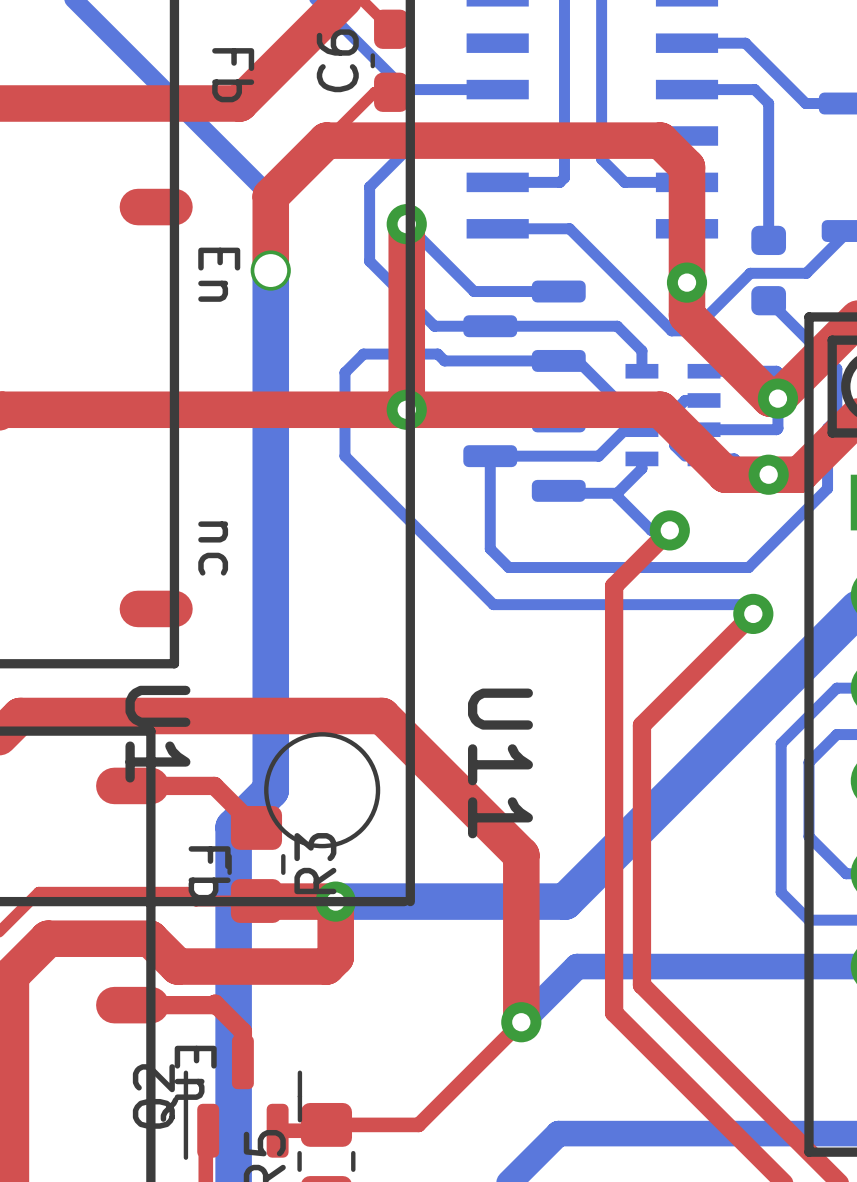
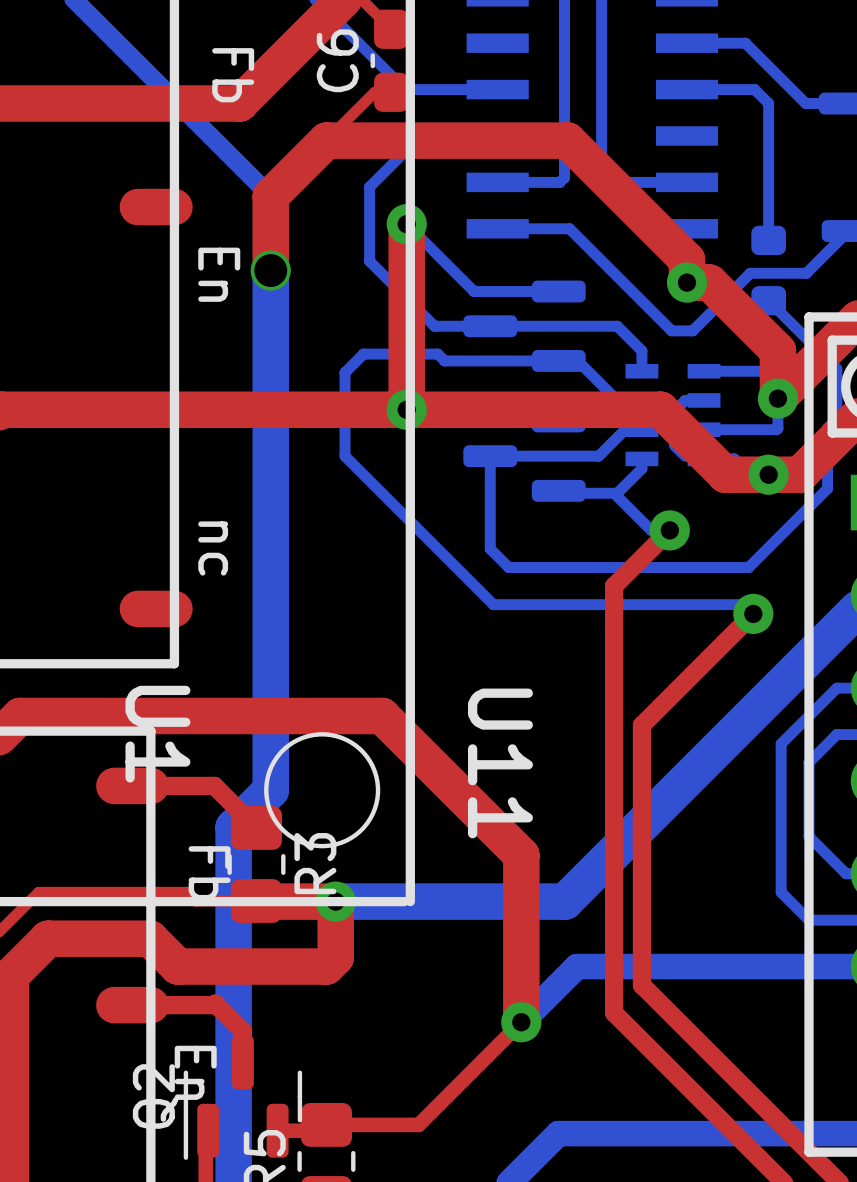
top track: (567, 140) (660, 140) (687, 167) (687, 259) -> (567, 140) (687, 259)
top track: (687, 282) (687, 315) (770, 398) (777, 398) -> (687, 282) (709, 282) (777, 350) (777, 398)

